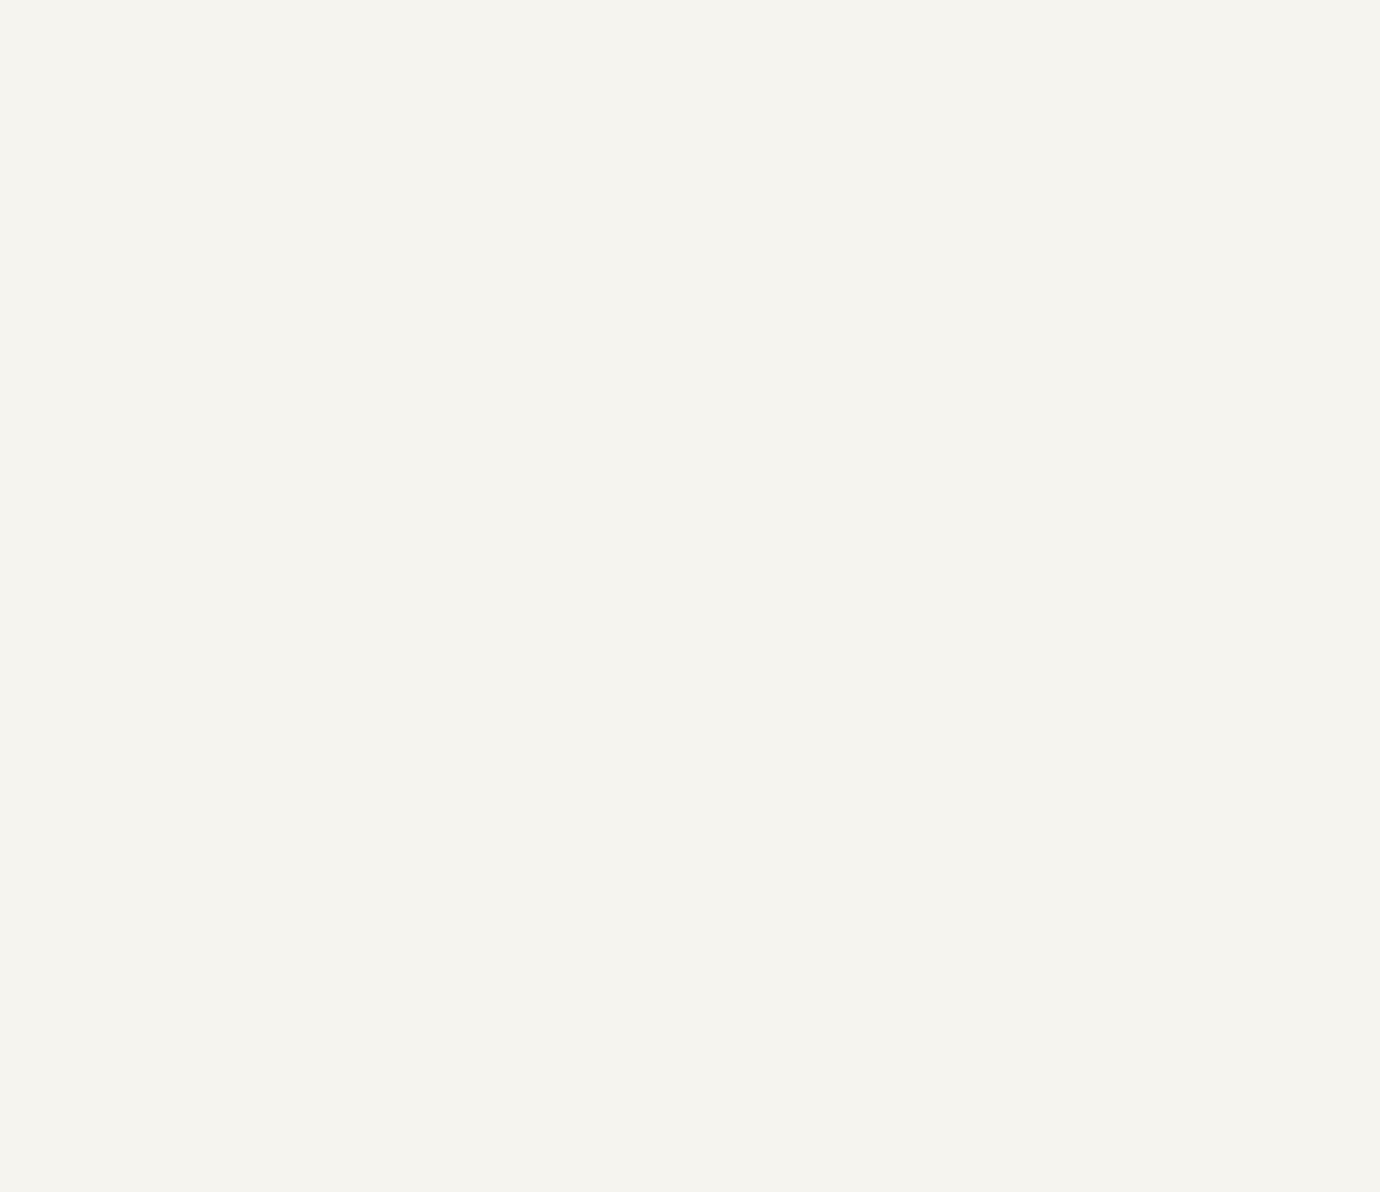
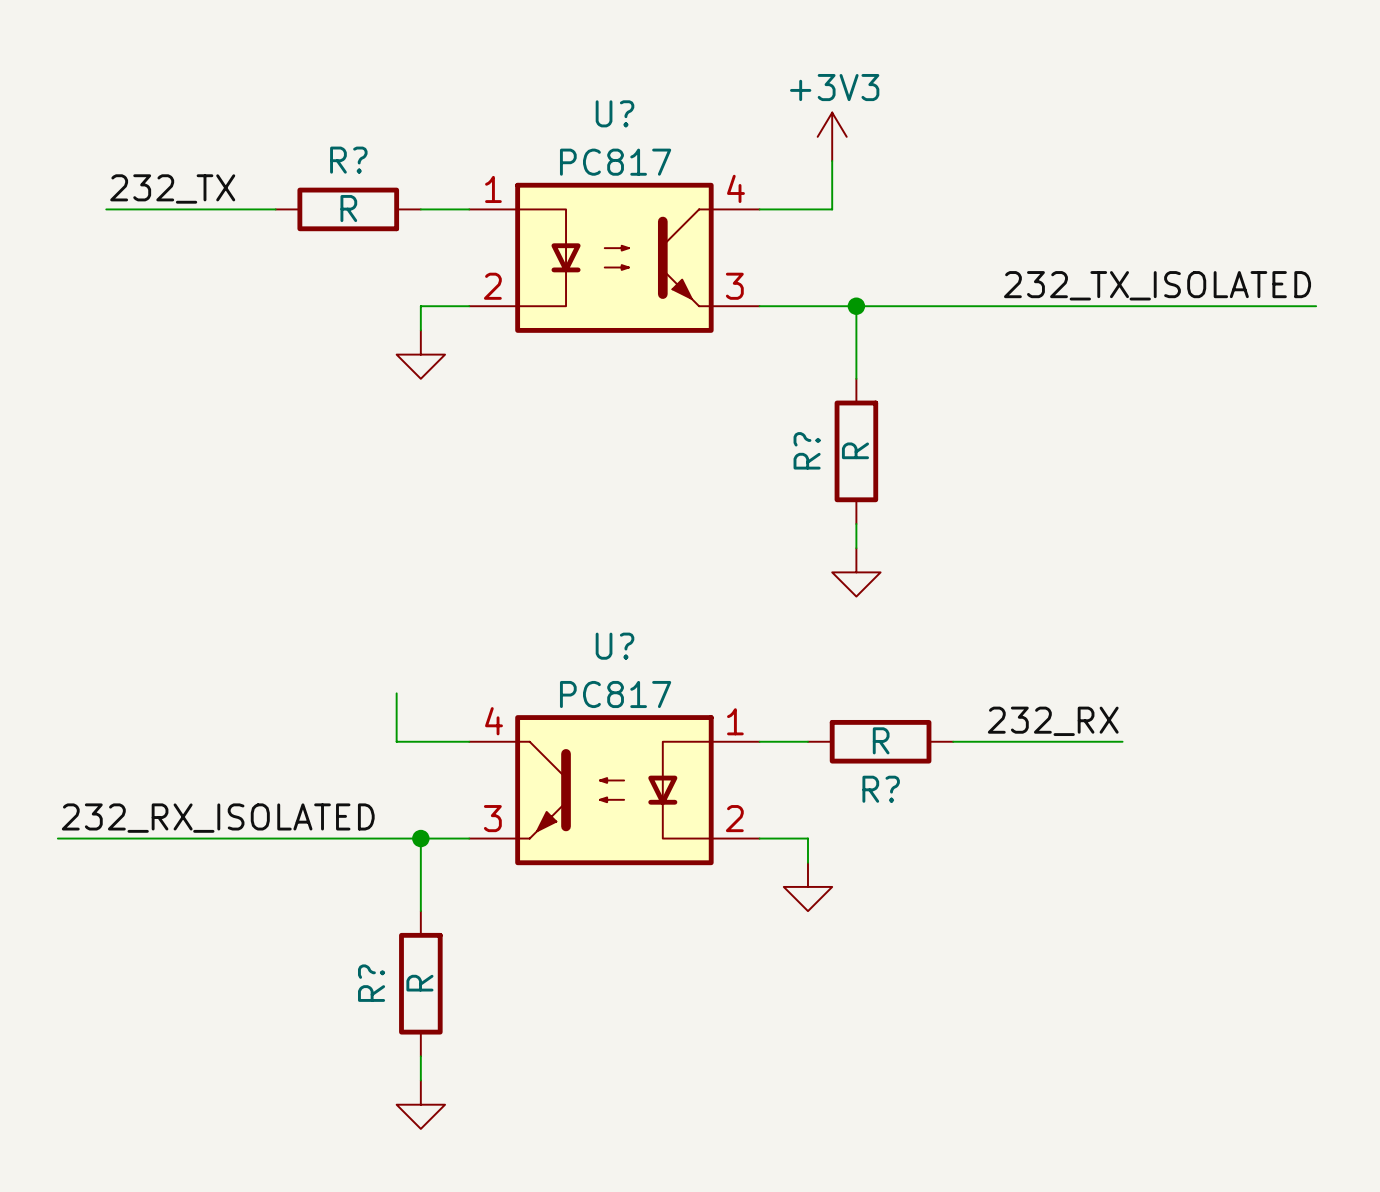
power symbol: none -> +3V3 (832, 136)
wire: none -> (832, 161) (832, 209) (759, 209)
label: none -> 232_TX (172, 188)
wire: none -> (106, 209) (275, 209)
R?: none -> R (348, 209)
wire: none -> (420, 209) (469, 209)
U?: none -> PC817 (614, 257)
label: none -> 232_TX_ISOLATED (1157, 285)
wire: none -> (469, 306) (420, 306) (420, 330)
wire: none -> (759, 306) (1316, 306)
wire: none -> (856, 306) (856, 378)
junction: none -> (856, 306)
power symbol: none -> (420, 354)
R?: none -> R (856, 451)
wire: none -> (856, 523) (856, 548)
power symbol: none -> (856, 572)
wire: none -> (396, 693) (396, 741) (469, 741)
label: none -> 232_RX (1053, 721)
wire: none -> (759, 741) (807, 741)
R?: none -> R (880, 741)
wire: none -> (953, 741) (1122, 741)
U?: none -> PC817 (614, 790)
label: none -> 232_RX_ISOLATED (218, 818)
wire: none -> (57, 838) (469, 838)
wire: none -> (420, 838) (420, 911)
junction: none -> (420, 838)
wire: none -> (759, 838) (807, 838) (807, 862)
power symbol: none -> (807, 886)
R?: none -> R (420, 983)
wire: none -> (420, 1056) (420, 1080)
power symbol: none -> (420, 1104)

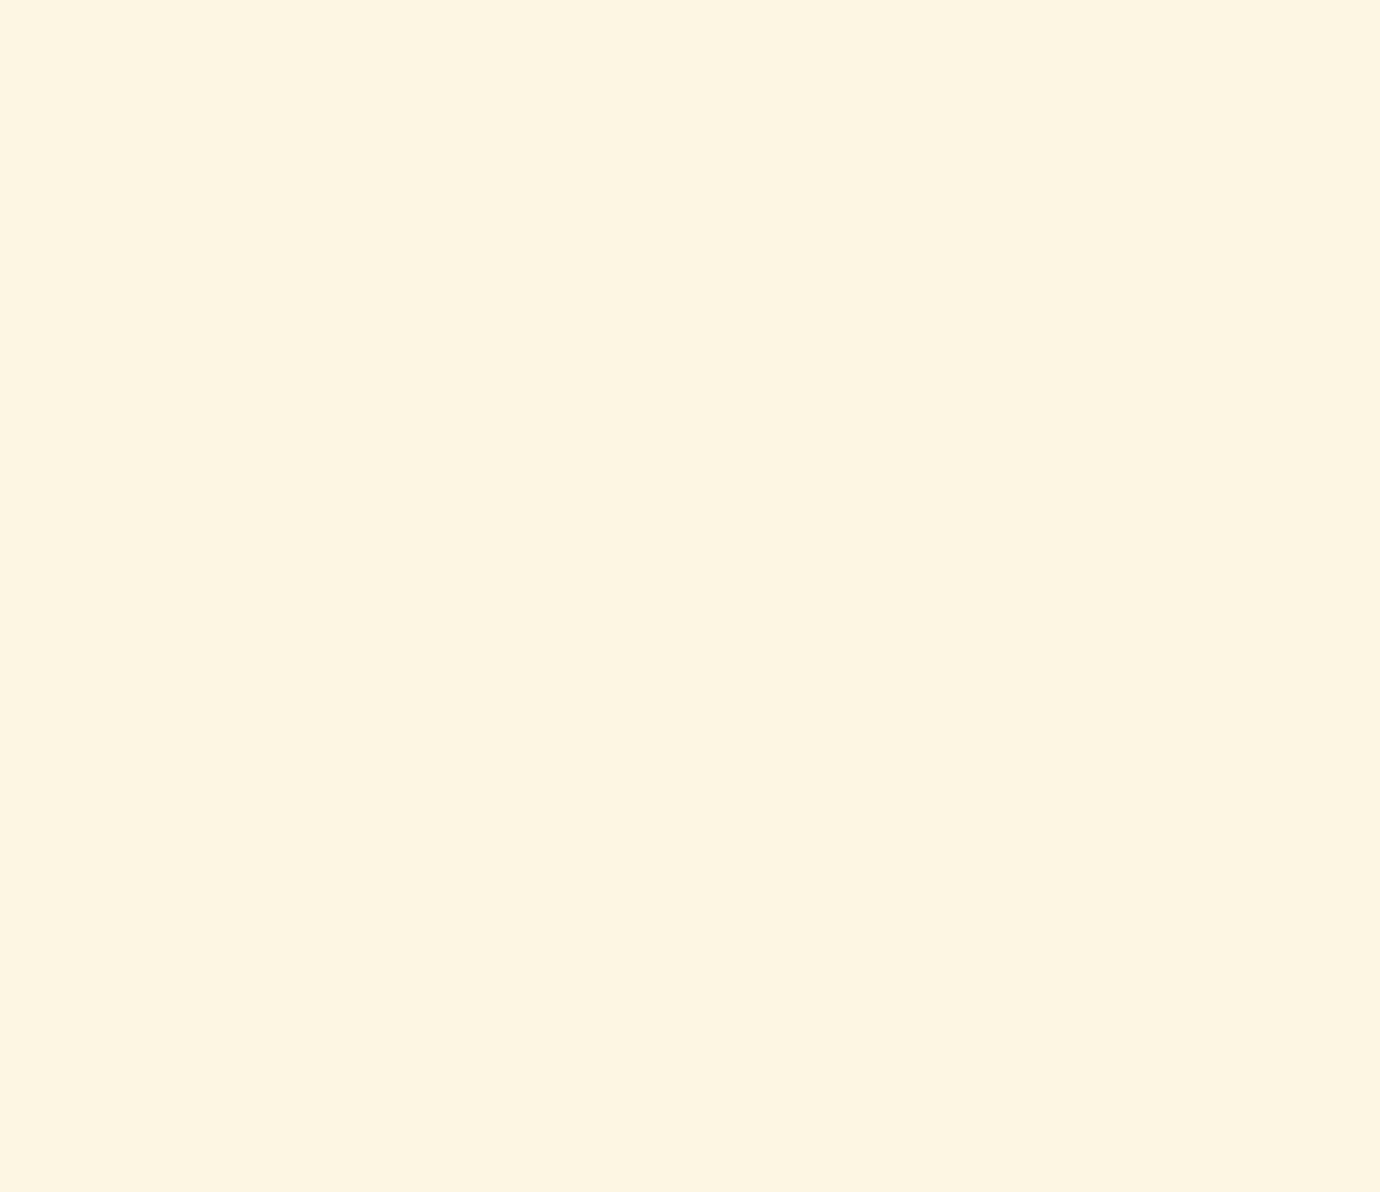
power symbol: +3V3 (832, 136) -> none
wire: (832, 161) (832, 209) (759, 209) -> none
label: 232_TX (172, 188) -> none
wire: (106, 209) (275, 209) -> none
R?: R (348, 209) -> none
wire: (420, 209) (469, 209) -> none
U?: PC817 (614, 257) -> none
label: 232_TX_ISOLATED (1157, 285) -> none
wire: (469, 306) (420, 306) (420, 330) -> none
wire: (759, 306) (1316, 306) -> none
wire: (856, 306) (856, 378) -> none
junction: (856, 306) -> none
power symbol: (420, 354) -> none
R?: R (856, 451) -> none
wire: (856, 523) (856, 548) -> none
power symbol: (856, 572) -> none
wire: (396, 693) (396, 741) (469, 741) -> none
label: 232_RX (1053, 721) -> none
wire: (759, 741) (807, 741) -> none
R?: R (880, 741) -> none
wire: (953, 741) (1122, 741) -> none
U?: PC817 (614, 790) -> none
label: 232_RX_ISOLATED (218, 818) -> none
wire: (57, 838) (469, 838) -> none
wire: (420, 838) (420, 911) -> none
junction: (420, 838) -> none
wire: (759, 838) (807, 838) (807, 862) -> none
power symbol: (807, 886) -> none
R?: R (420, 983) -> none
wire: (420, 1056) (420, 1080) -> none
power symbol: (420, 1104) -> none

